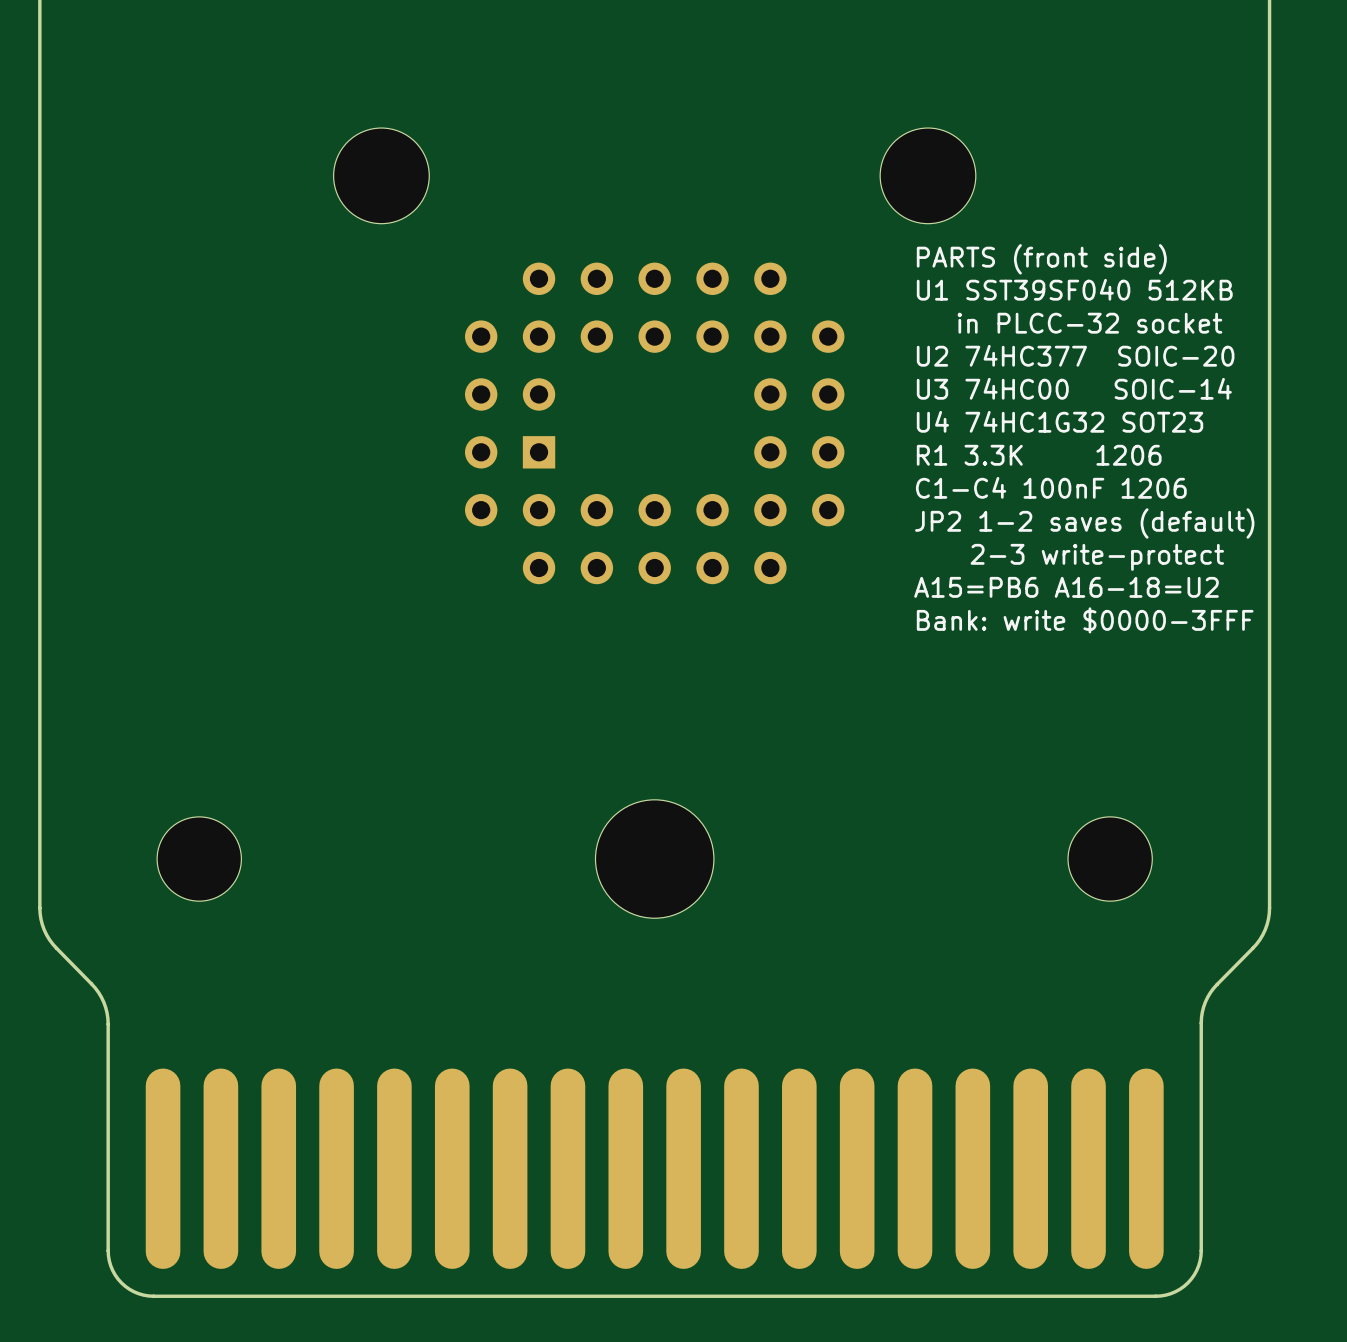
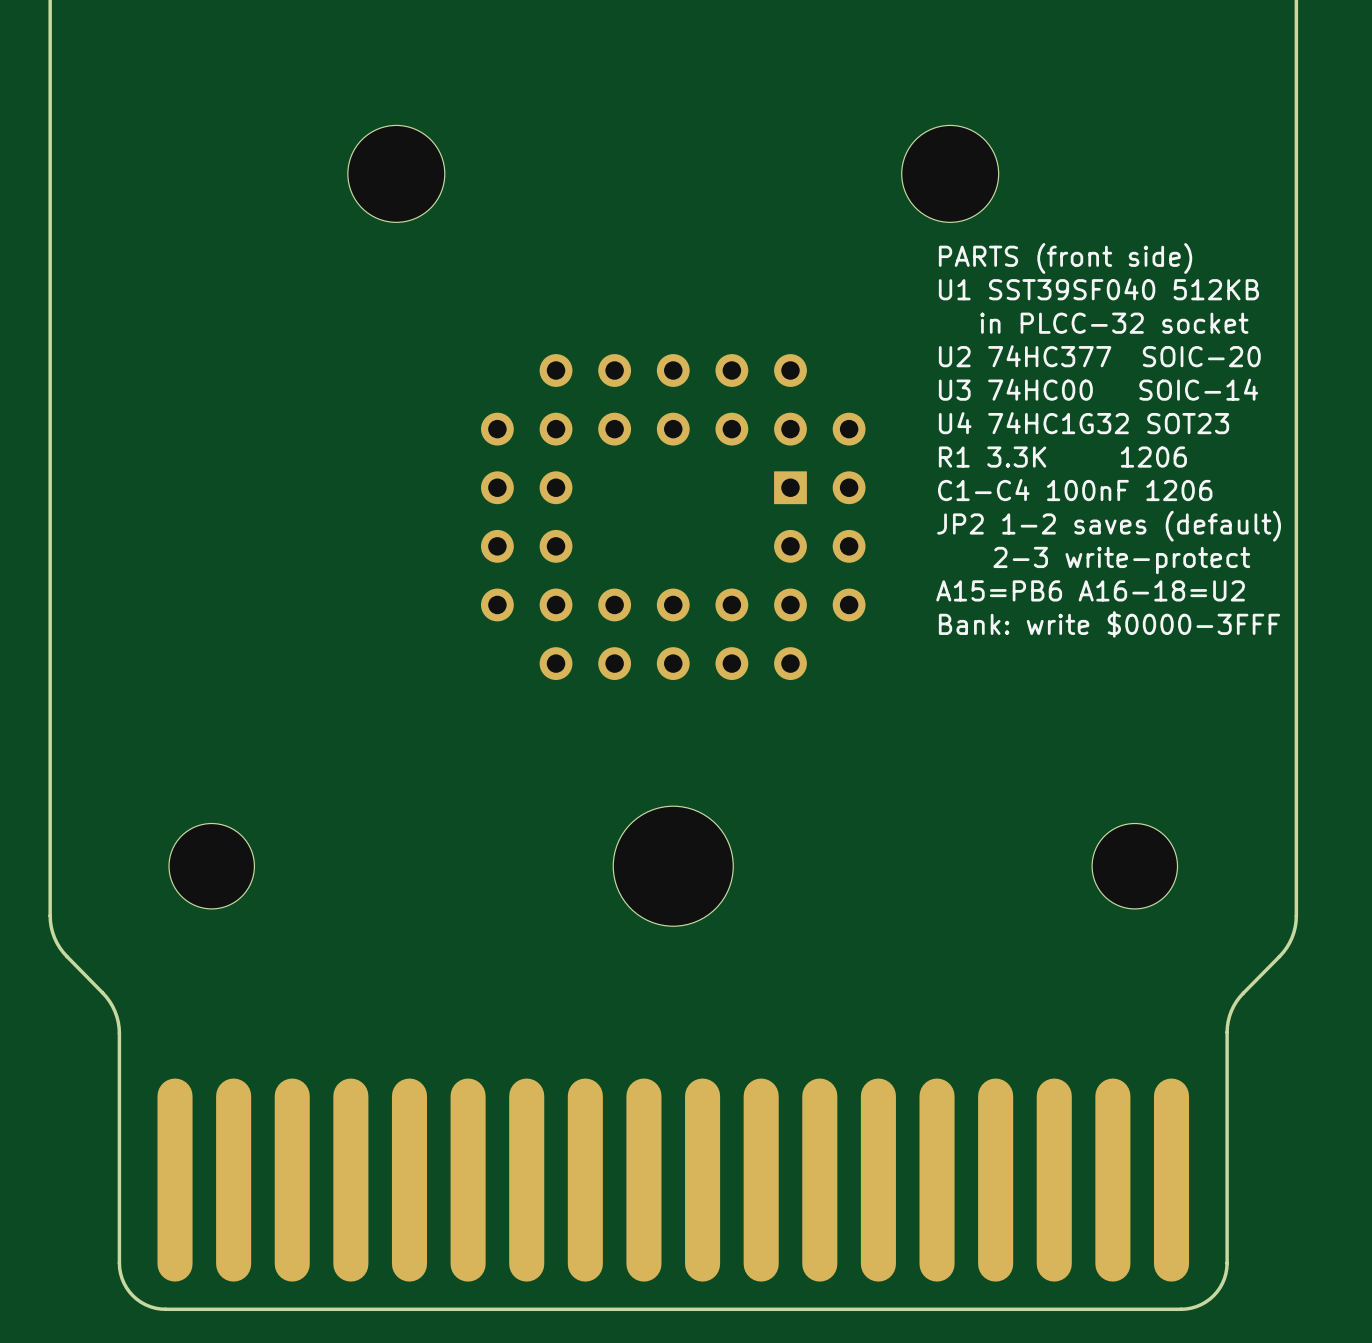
part rotation: 0° (654, 423) -> 180° (673, 517)

